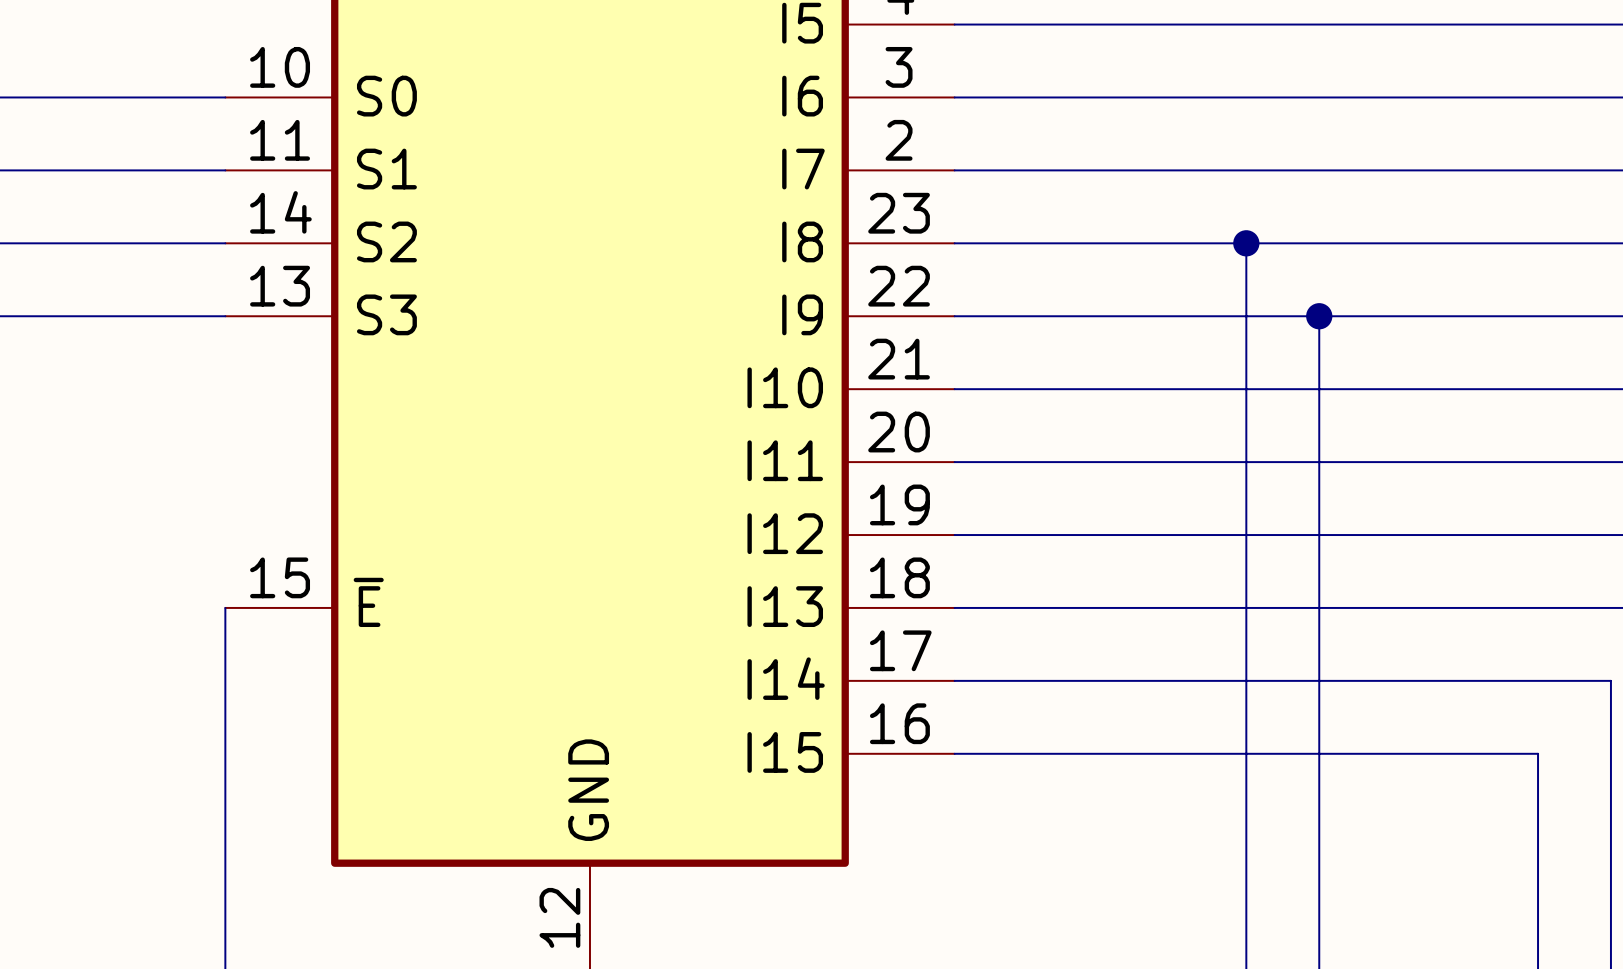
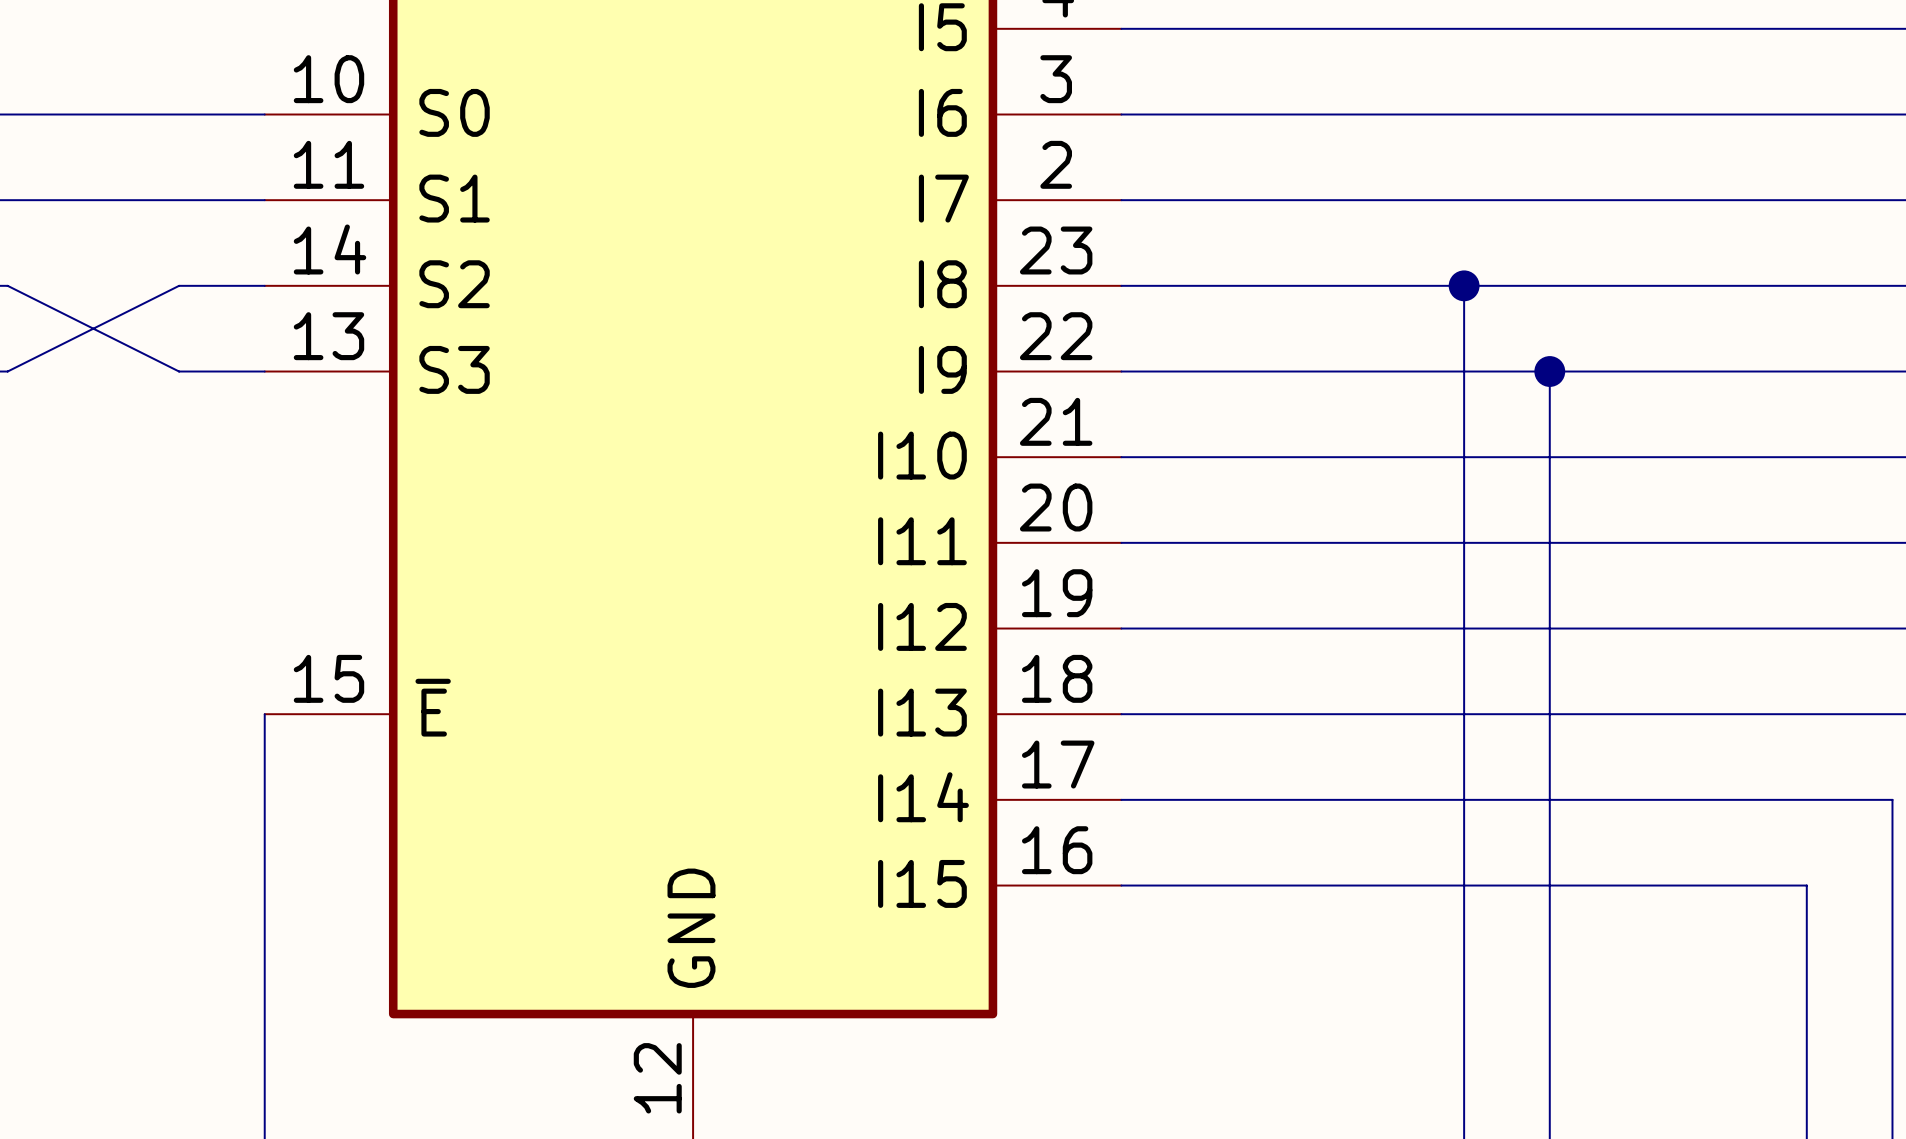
wire: (6, 243) (152, 243) -> (7, 285) (179, 371)
wire: (6, 316) (152, 316) -> (7, 371) (179, 285)

